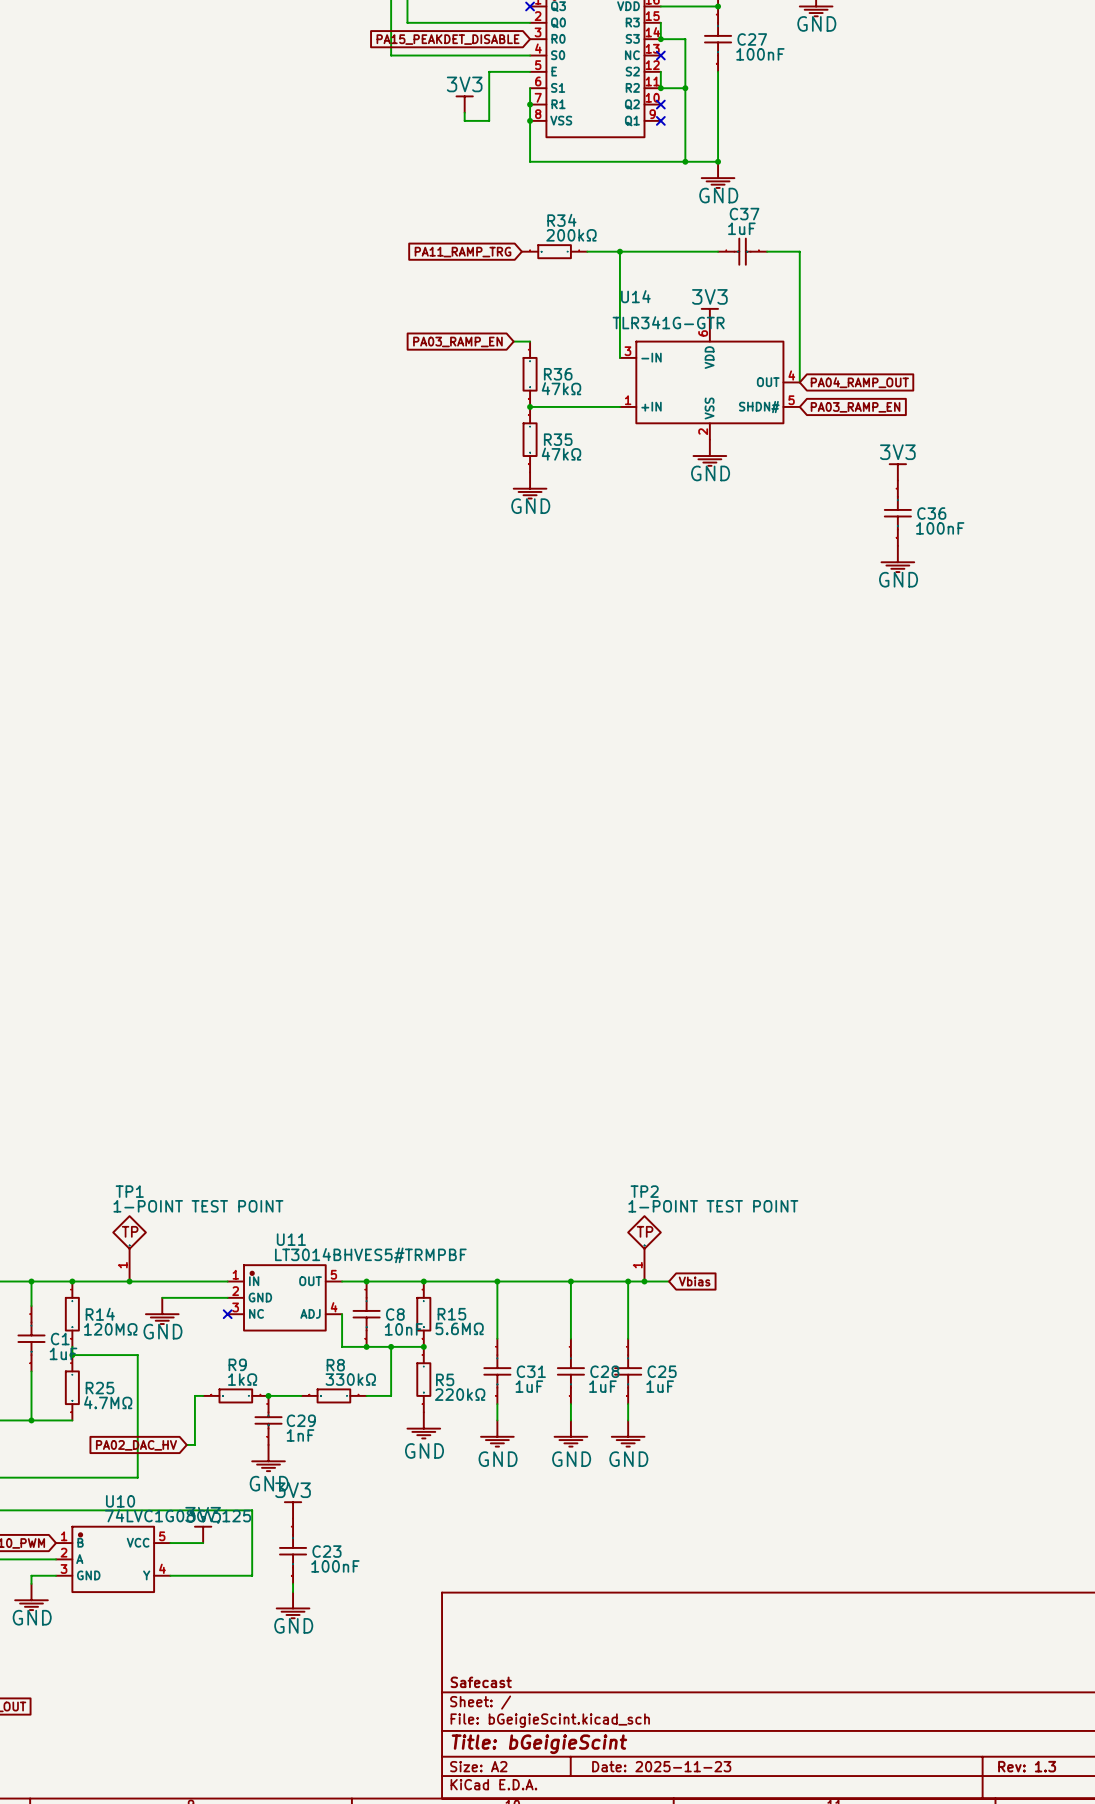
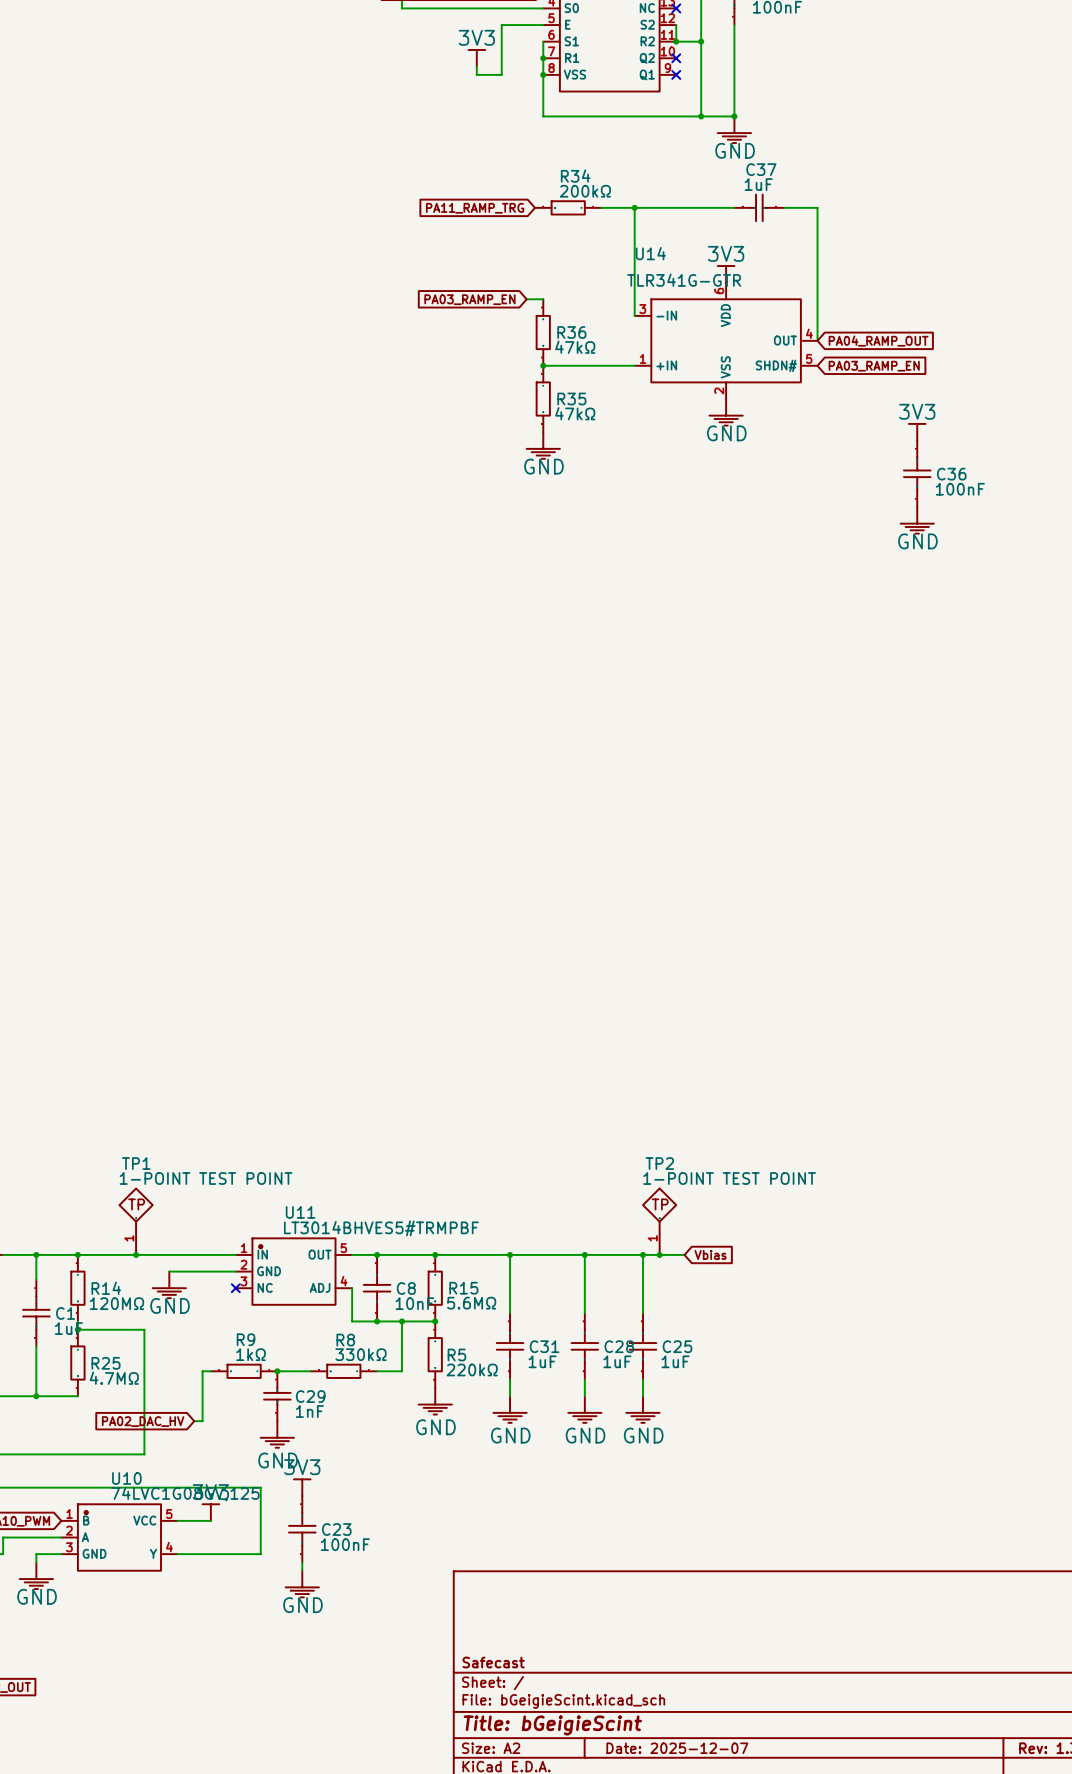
title block: Date: 2025-11-23 (661, 1766) -> Date: 2025-12-07 (677, 1748)

